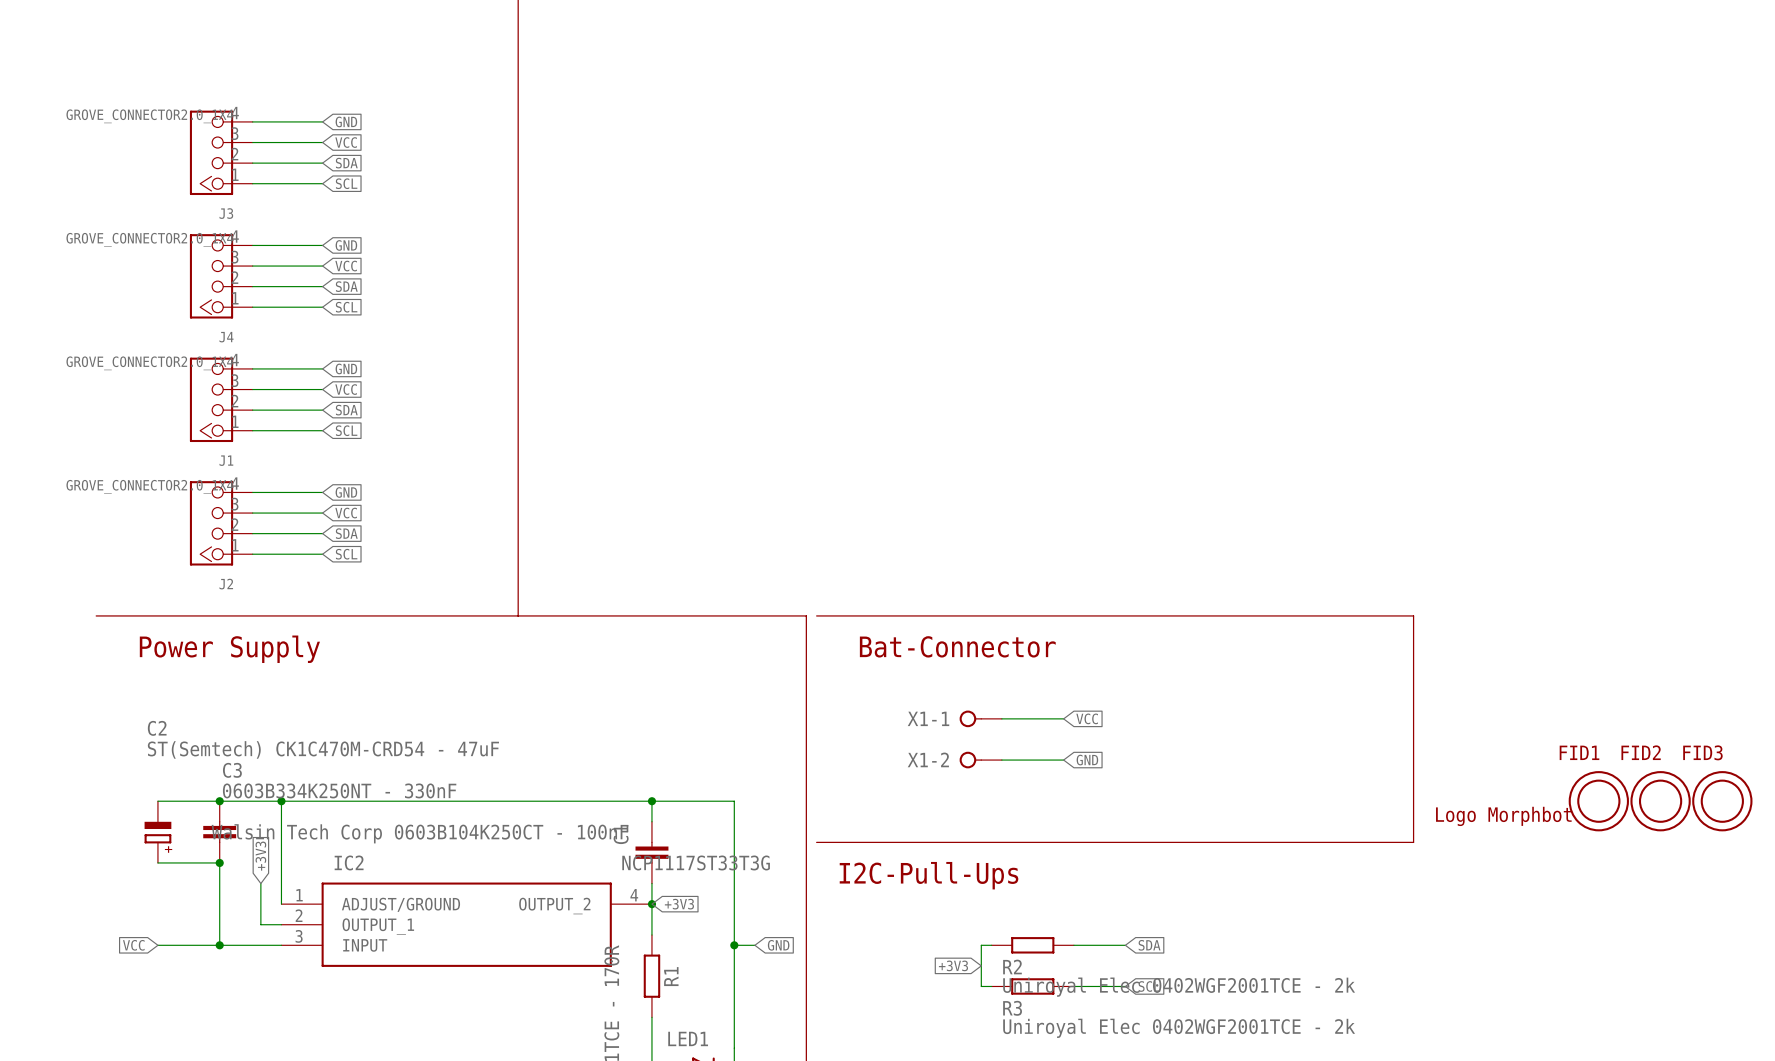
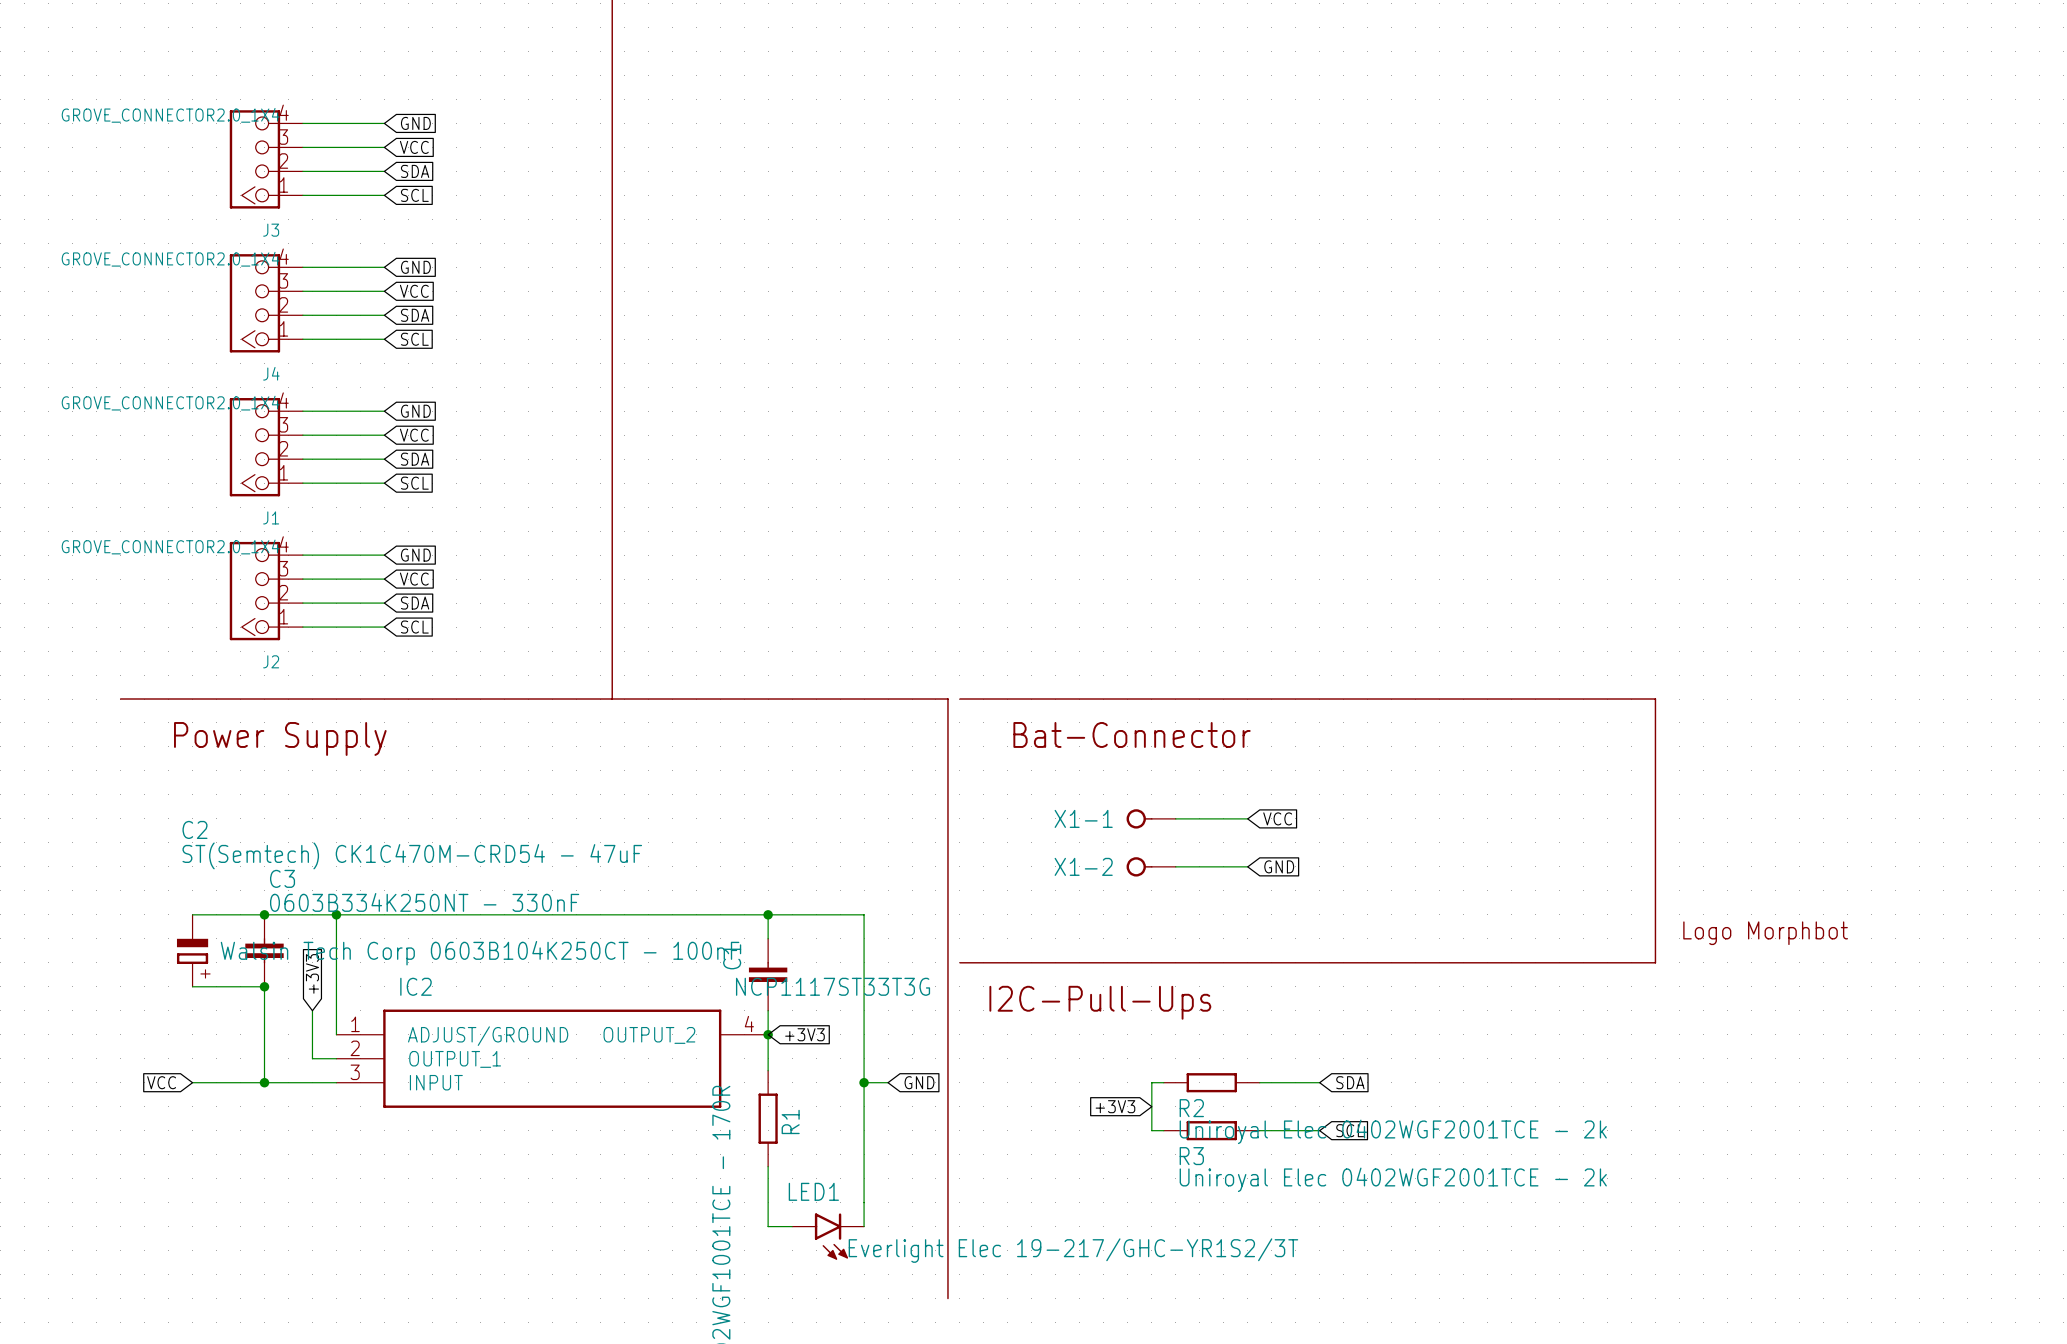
FID1: (1598, 801) -> none
FID2: (1660, 801) -> none
FID3: (1722, 801) -> none

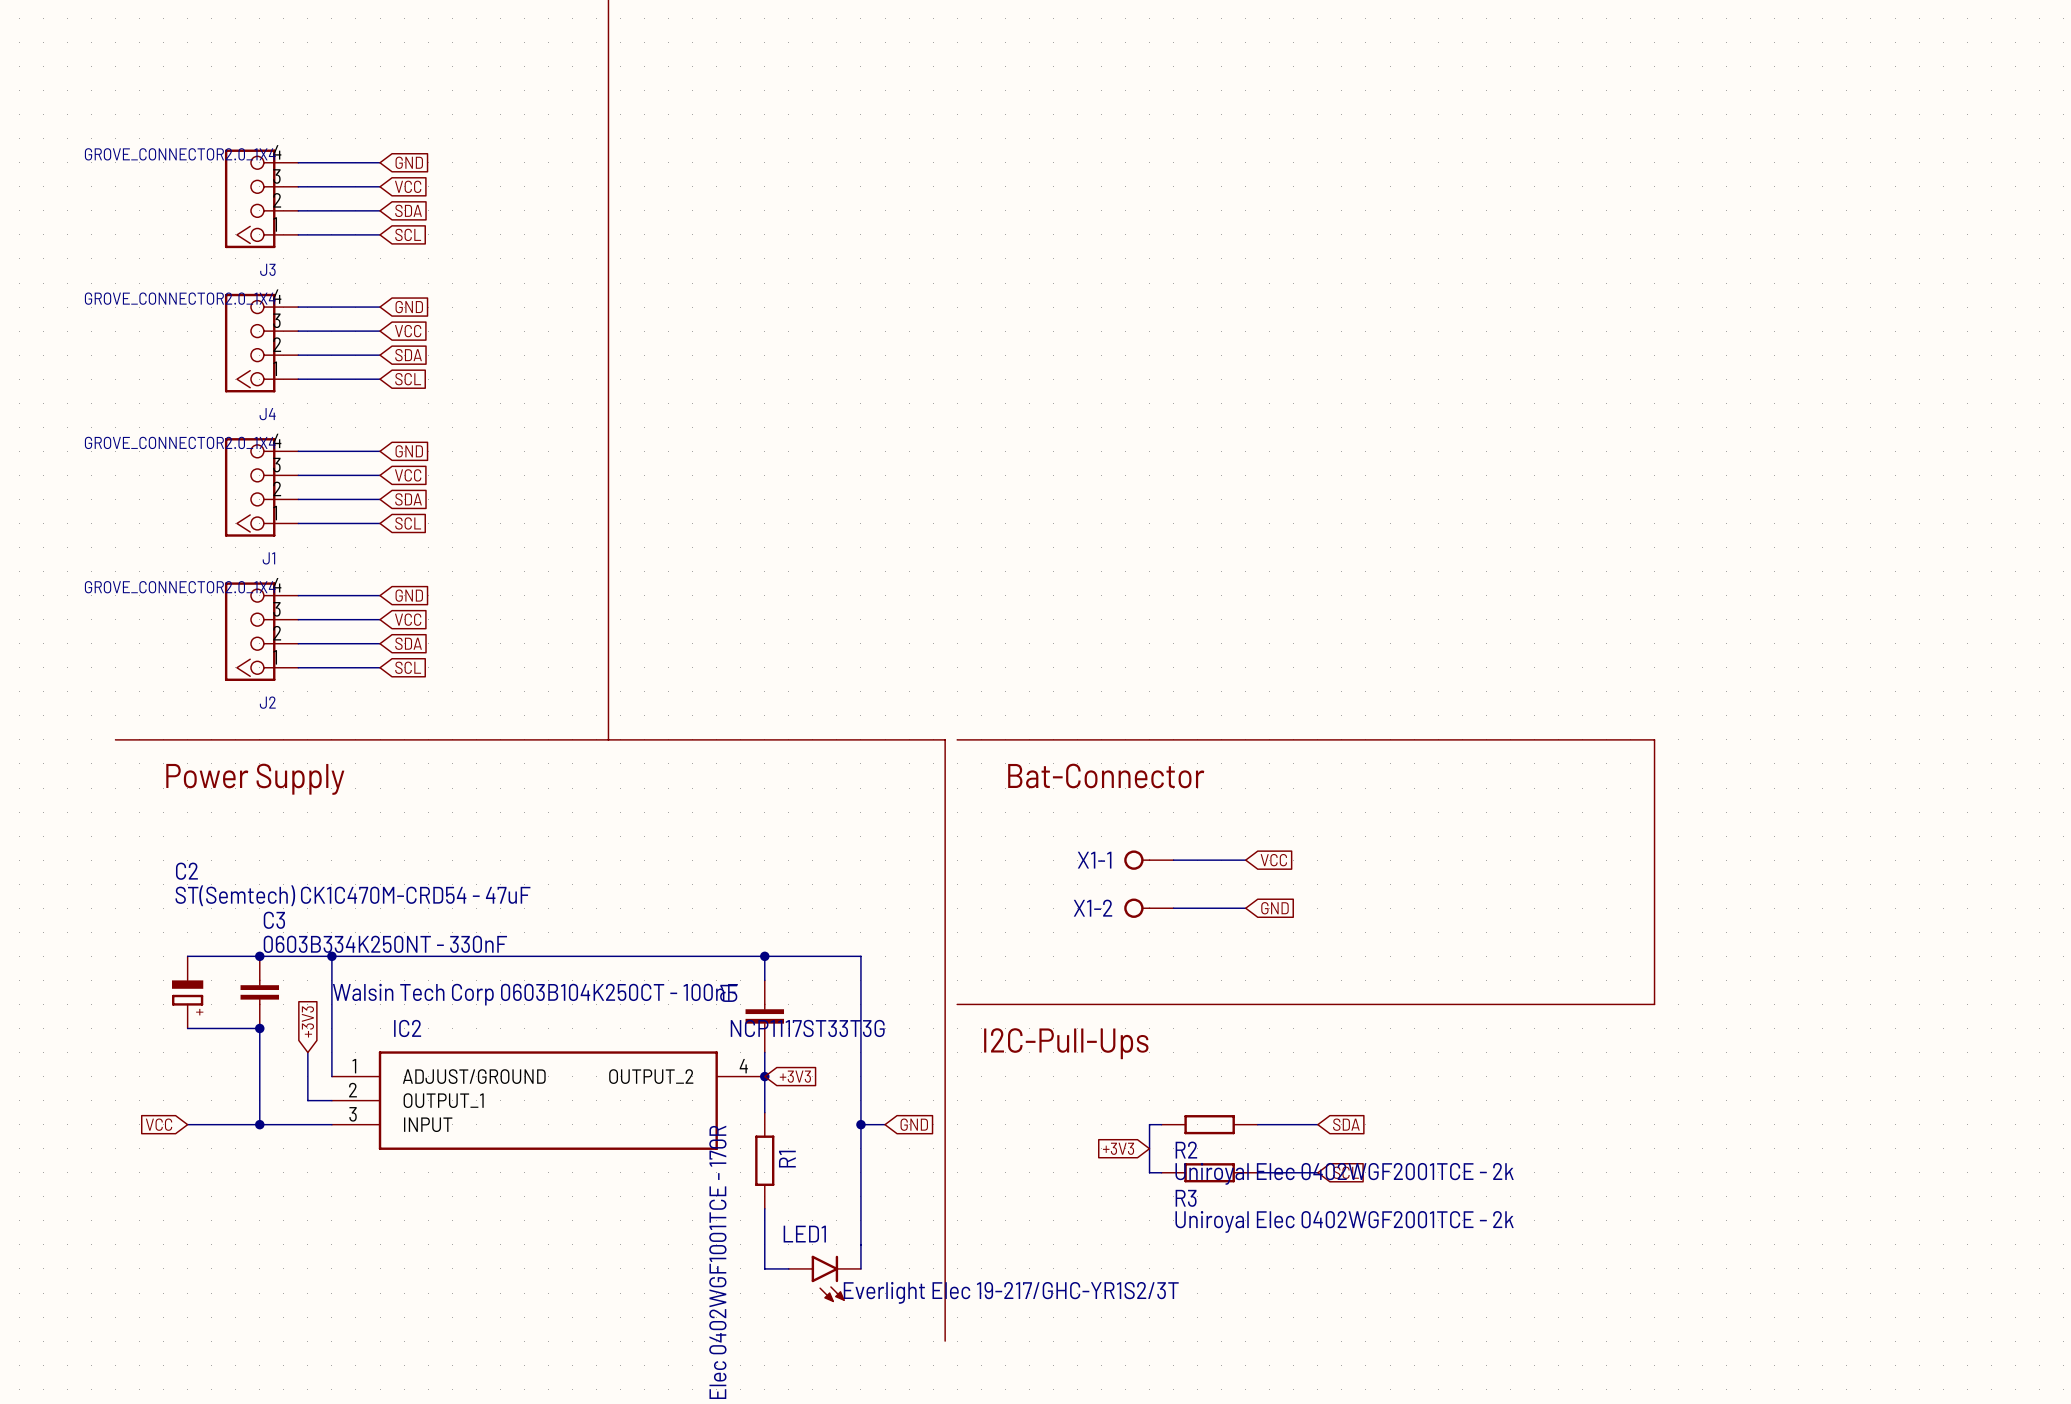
part: (1765, 933) -> none

